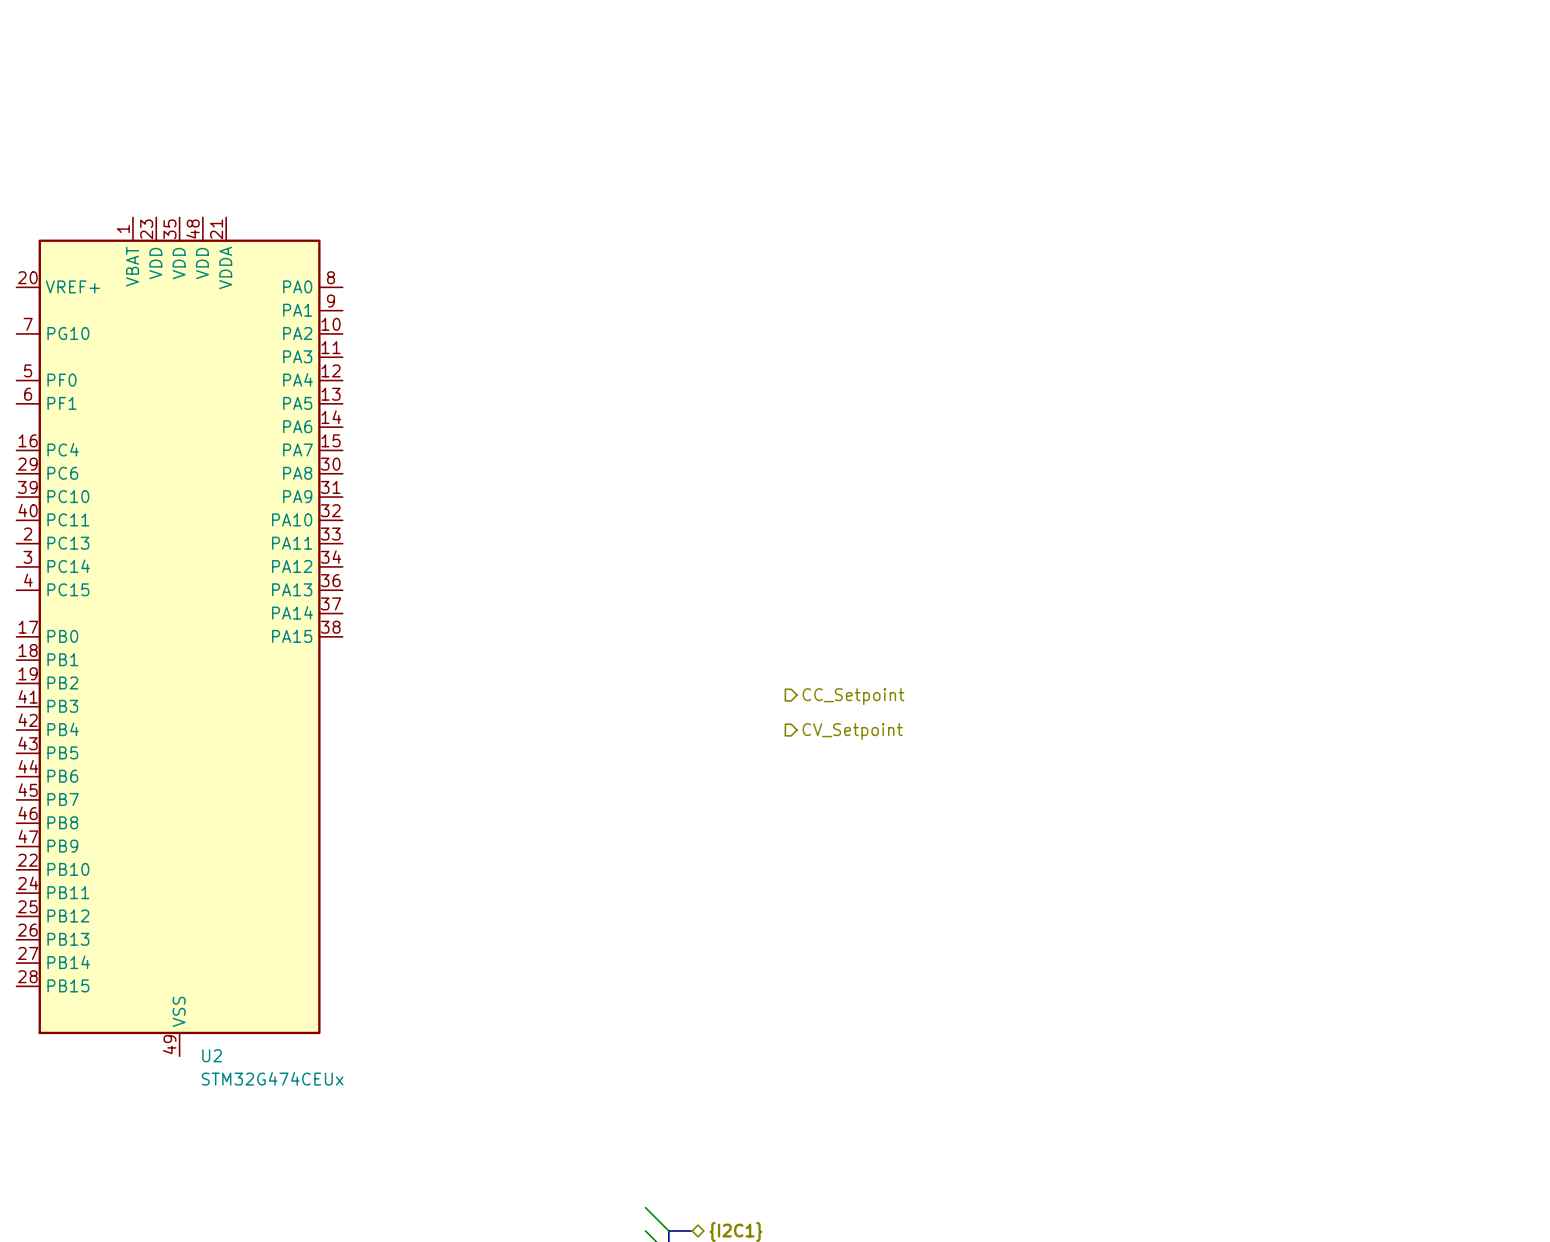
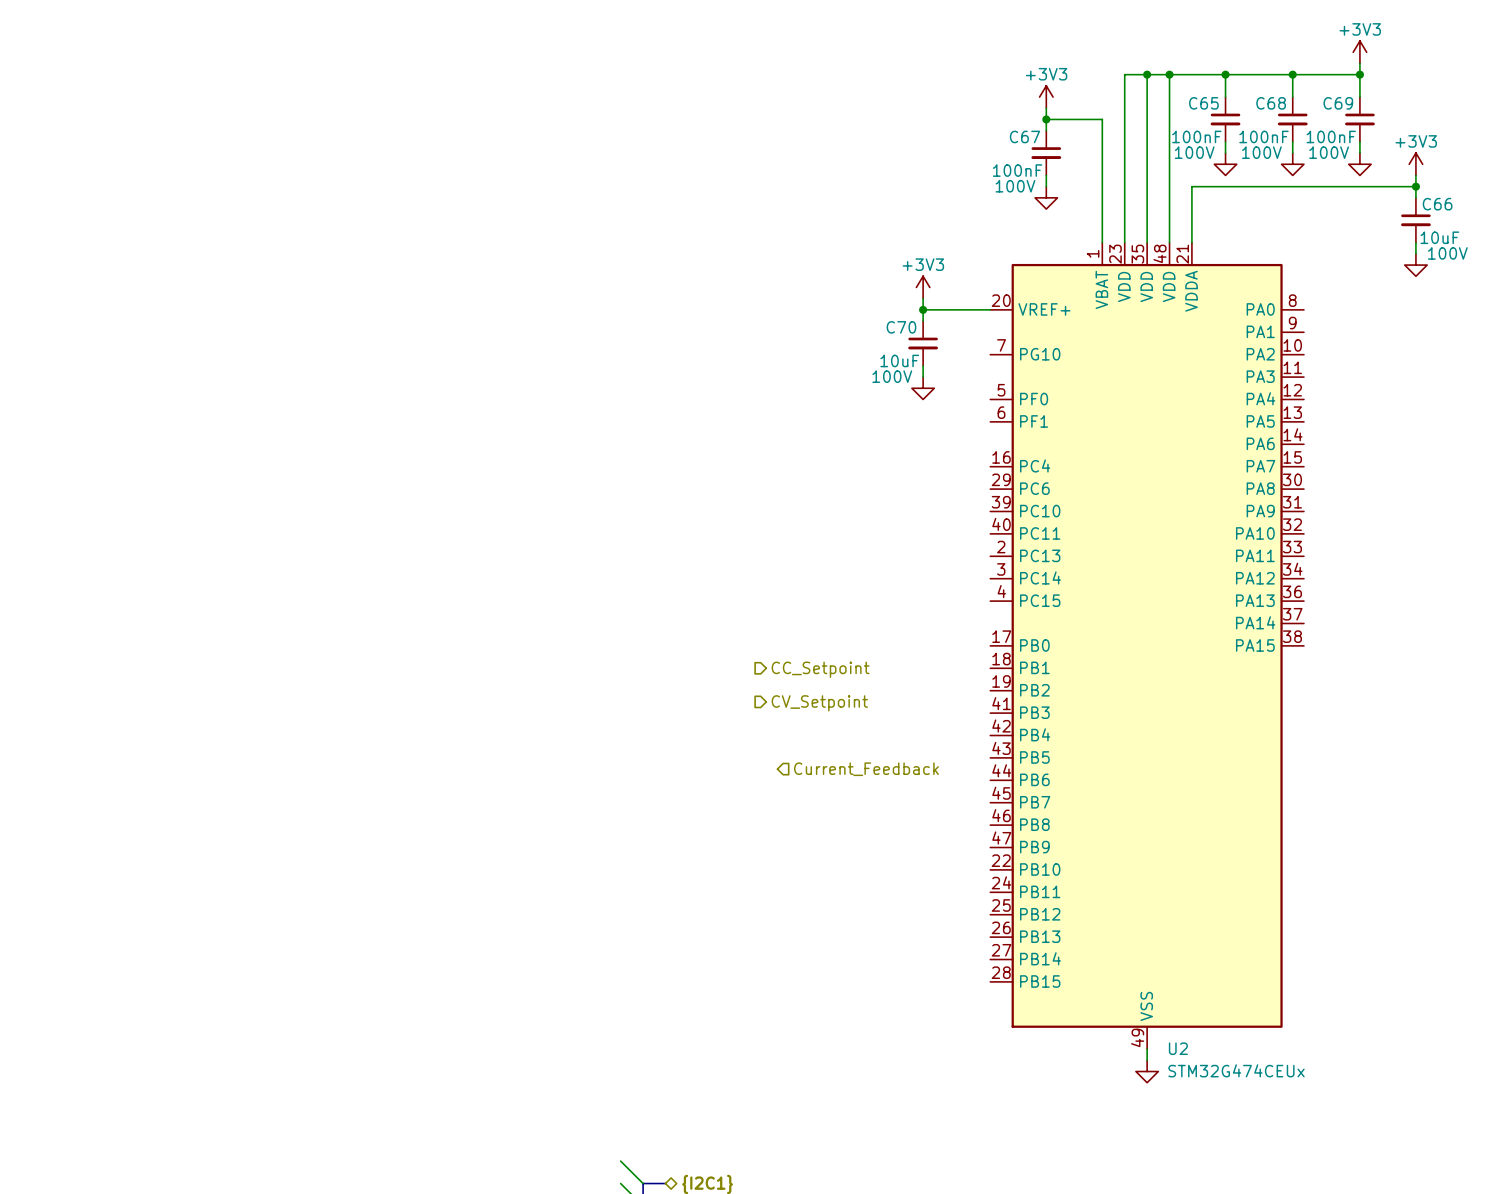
power symbol: none -> +3V3 (1359, 52)
wire: none -> (1359, 63) (1359, 97)
wire: none -> (1147, 74) (1147, 242)
junction: none -> (1147, 74)
wire: none -> (1169, 74) (1169, 242)
junction: none -> (1169, 74)
wire: none -> (1225, 74) (1225, 97)
junction: none -> (1225, 74)
wire: none -> (1292, 74) (1292, 97)
junction: none -> (1292, 74)
wire: none -> (1359, 74) (1124, 74) (1124, 242)
junction: none -> (1359, 74)
power symbol: none -> +3V3 (1046, 97)
wire: none -> (1046, 108) (1046, 130)
wire: none -> (1046, 119) (1102, 119) (1102, 242)
junction: none -> (1046, 119)
C65: none -> 100nF (1225, 119)
C68: none -> 100nF (1292, 119)
C69: none -> 100nF (1359, 119)
wire: none -> (1225, 141) (1225, 153)
wire: none -> (1292, 141) (1292, 153)
wire: none -> (1359, 141) (1359, 153)
C67: none -> 100nF (1046, 153)
power symbol: none -> (1225, 164)
power symbol: none -> (1292, 164)
power symbol: none -> (1359, 164)
power symbol: none -> +3V3 (1415, 164)
wire: none -> (1046, 175) (1046, 186)
wire: none -> (1415, 175) (1415, 197)
wire: none -> (1415, 186) (1191, 186) (1191, 242)
junction: none -> (1415, 186)
power symbol: none -> (1046, 197)
C66: none -> 10uF (1415, 220)
wire: none -> (1415, 242) (1415, 253)
power symbol: none -> (1415, 265)
power symbol: none -> +3V3 (923, 287)
wire: none -> (923, 298) (923, 321)
wire: none -> (923, 309) (990, 309)
junction: none -> (923, 309)
C70: none -> 10uF (923, 343)
wire: none -> (923, 365) (923, 377)
power symbol: none -> (923, 388)
U2 position: (179, 636) -> (1147, 645)
hierarchical label: none -> Current_Feedback (866, 769)
wire: none -> (1147, 1049) (1147, 1060)
power symbol: none -> (1147, 1071)

